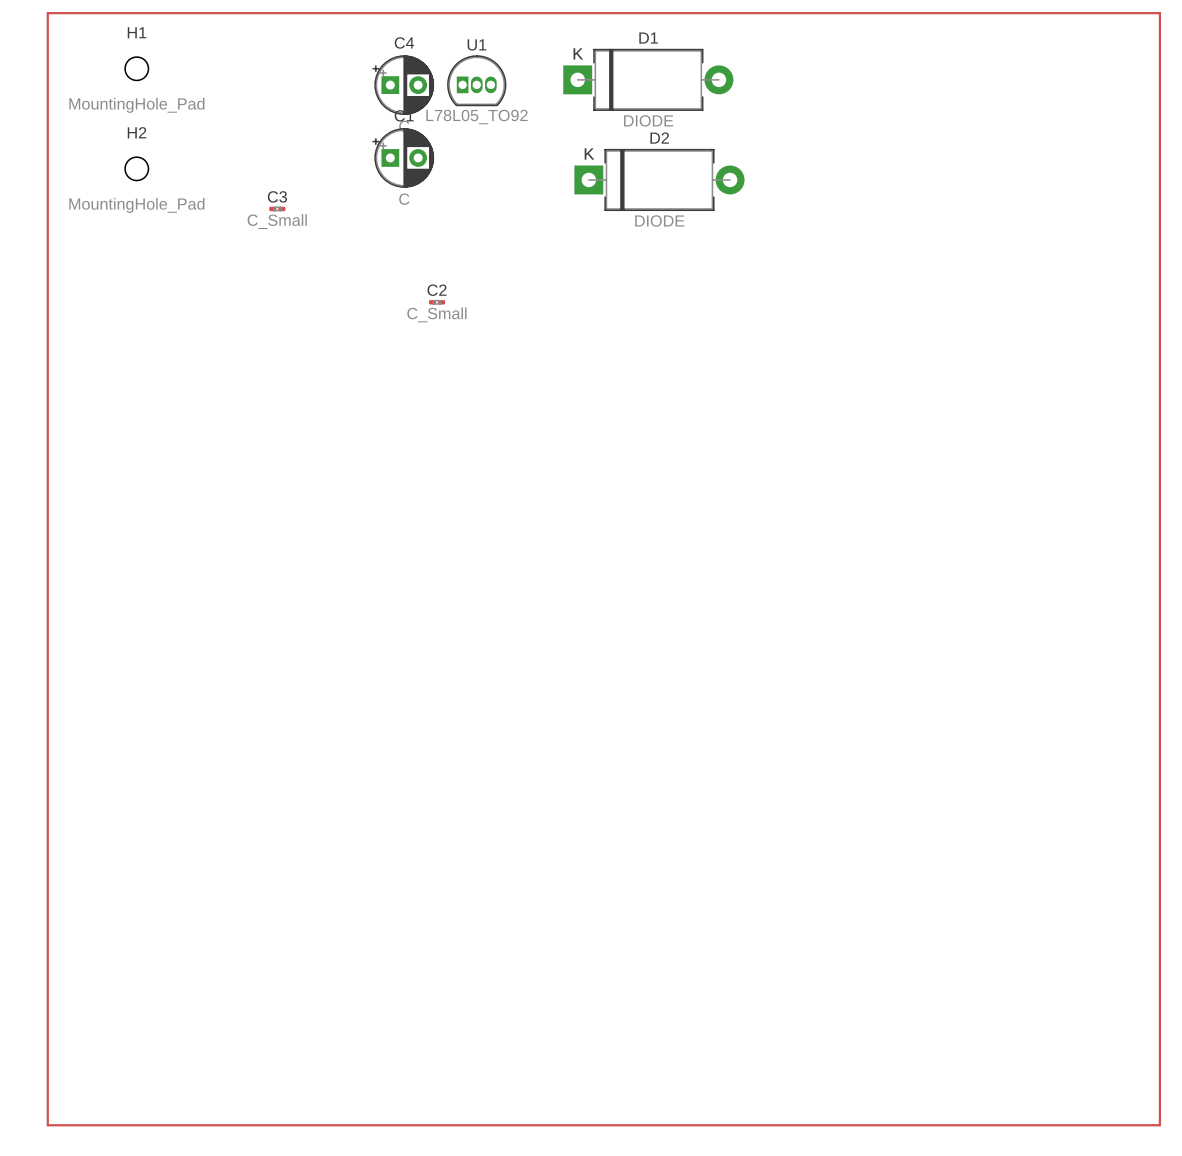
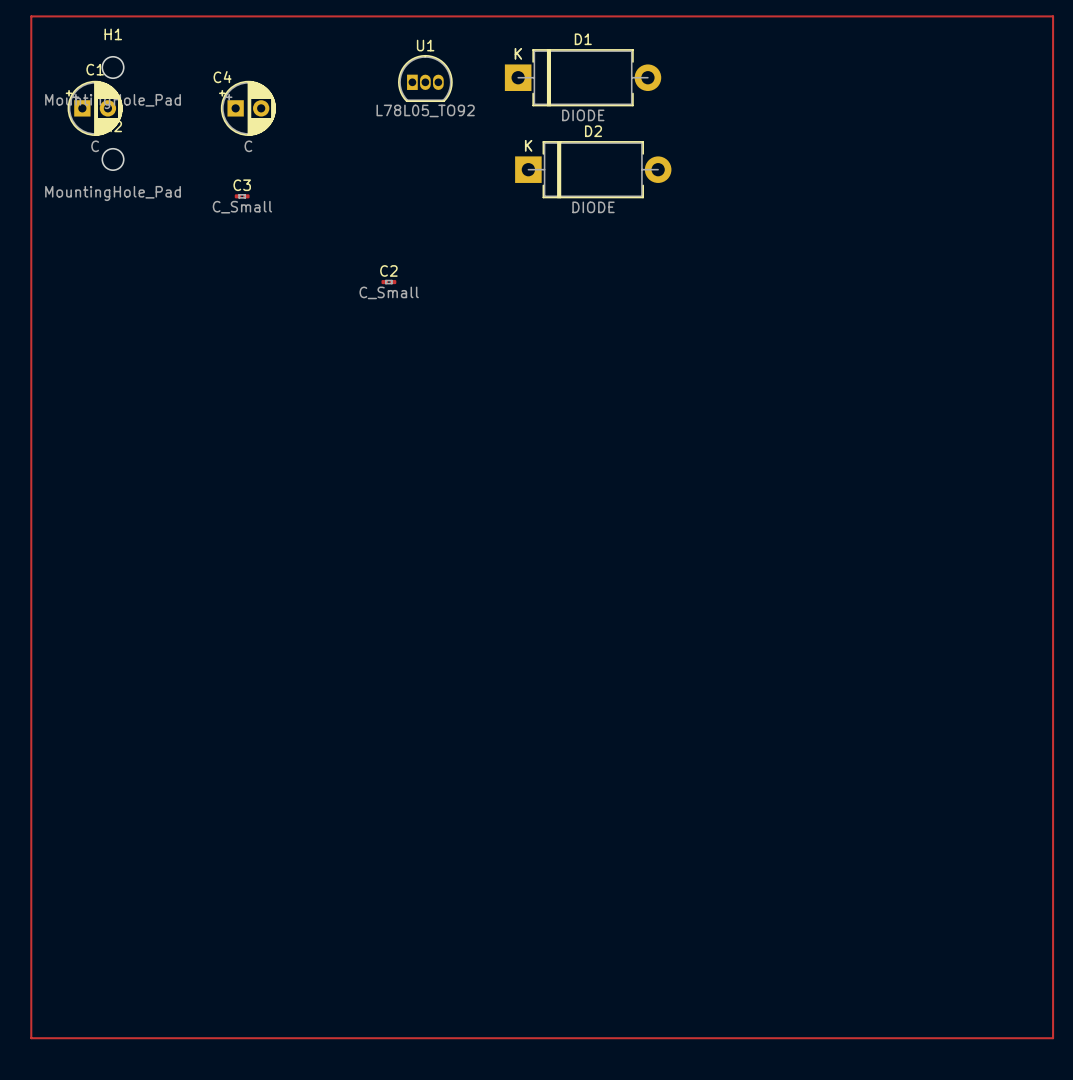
C4 name position: C4 (404, 42) -> C4 (222, 77)
C4 position: (403, 85) -> (247, 108)
C1 position: (403, 157) -> (94, 108)

